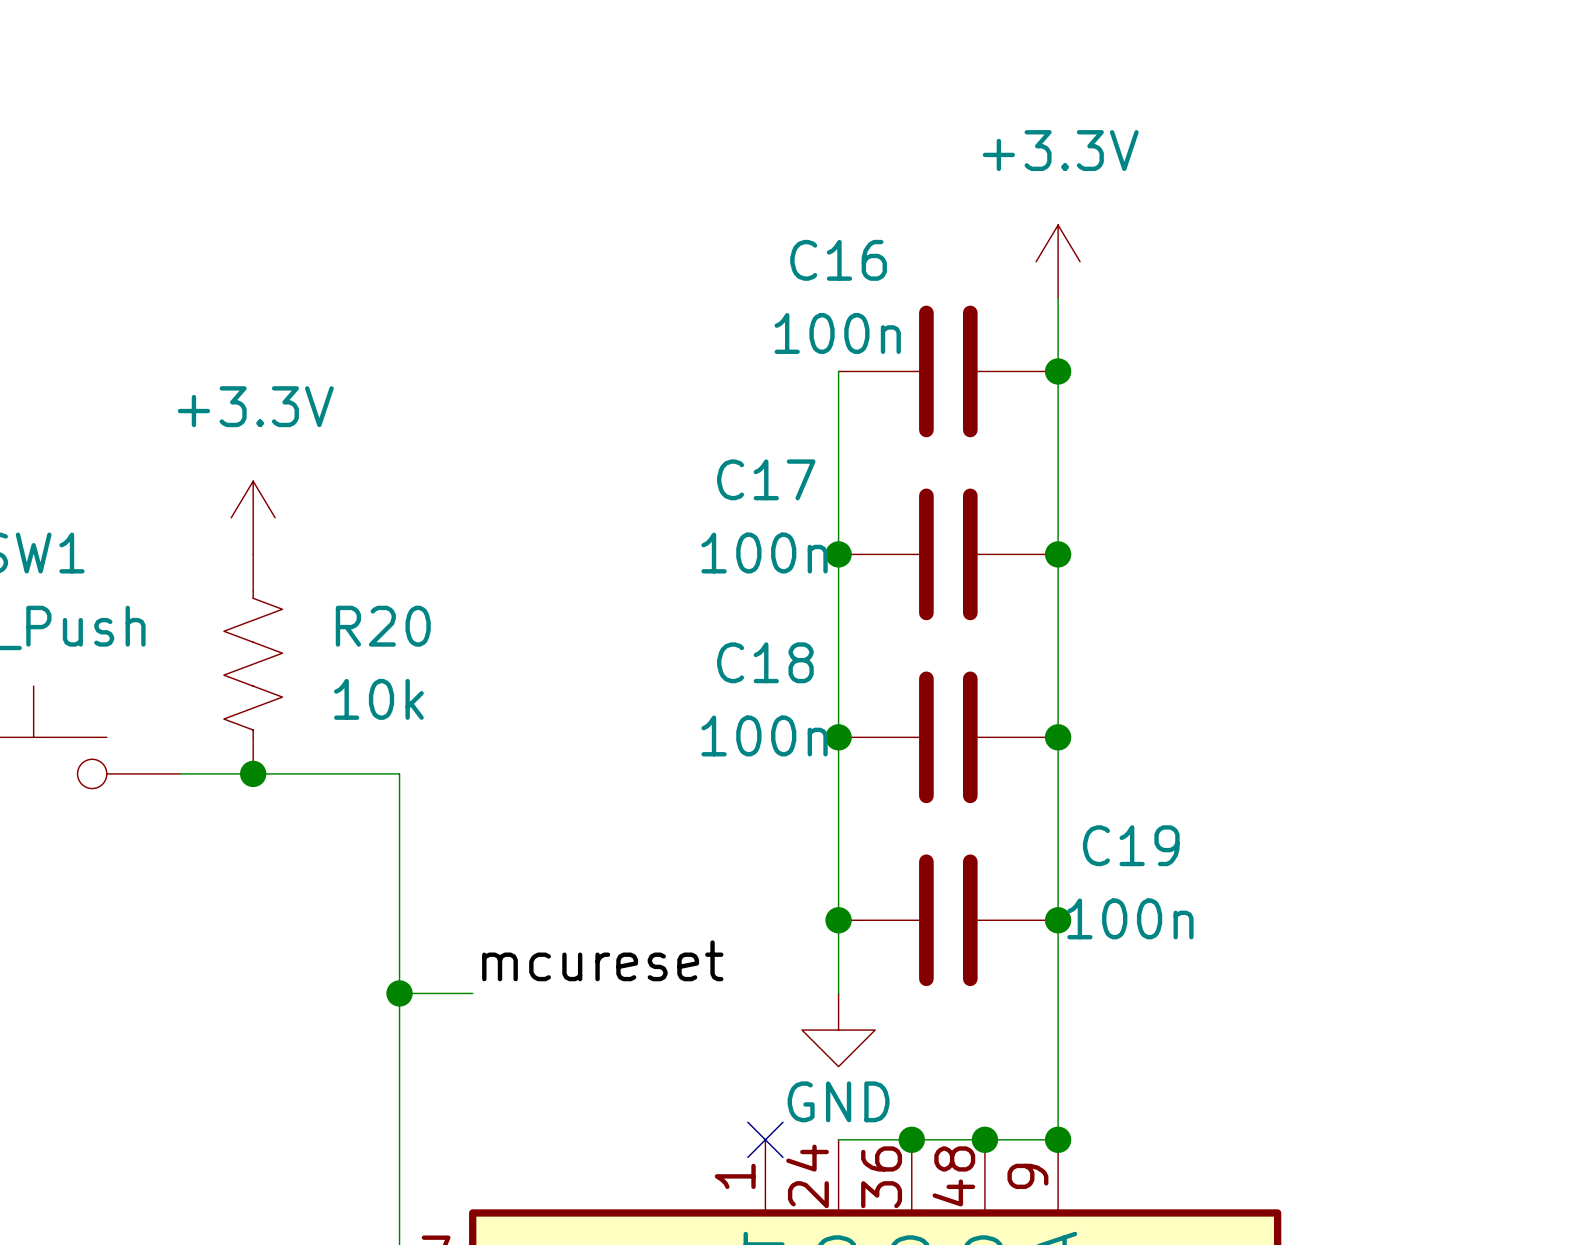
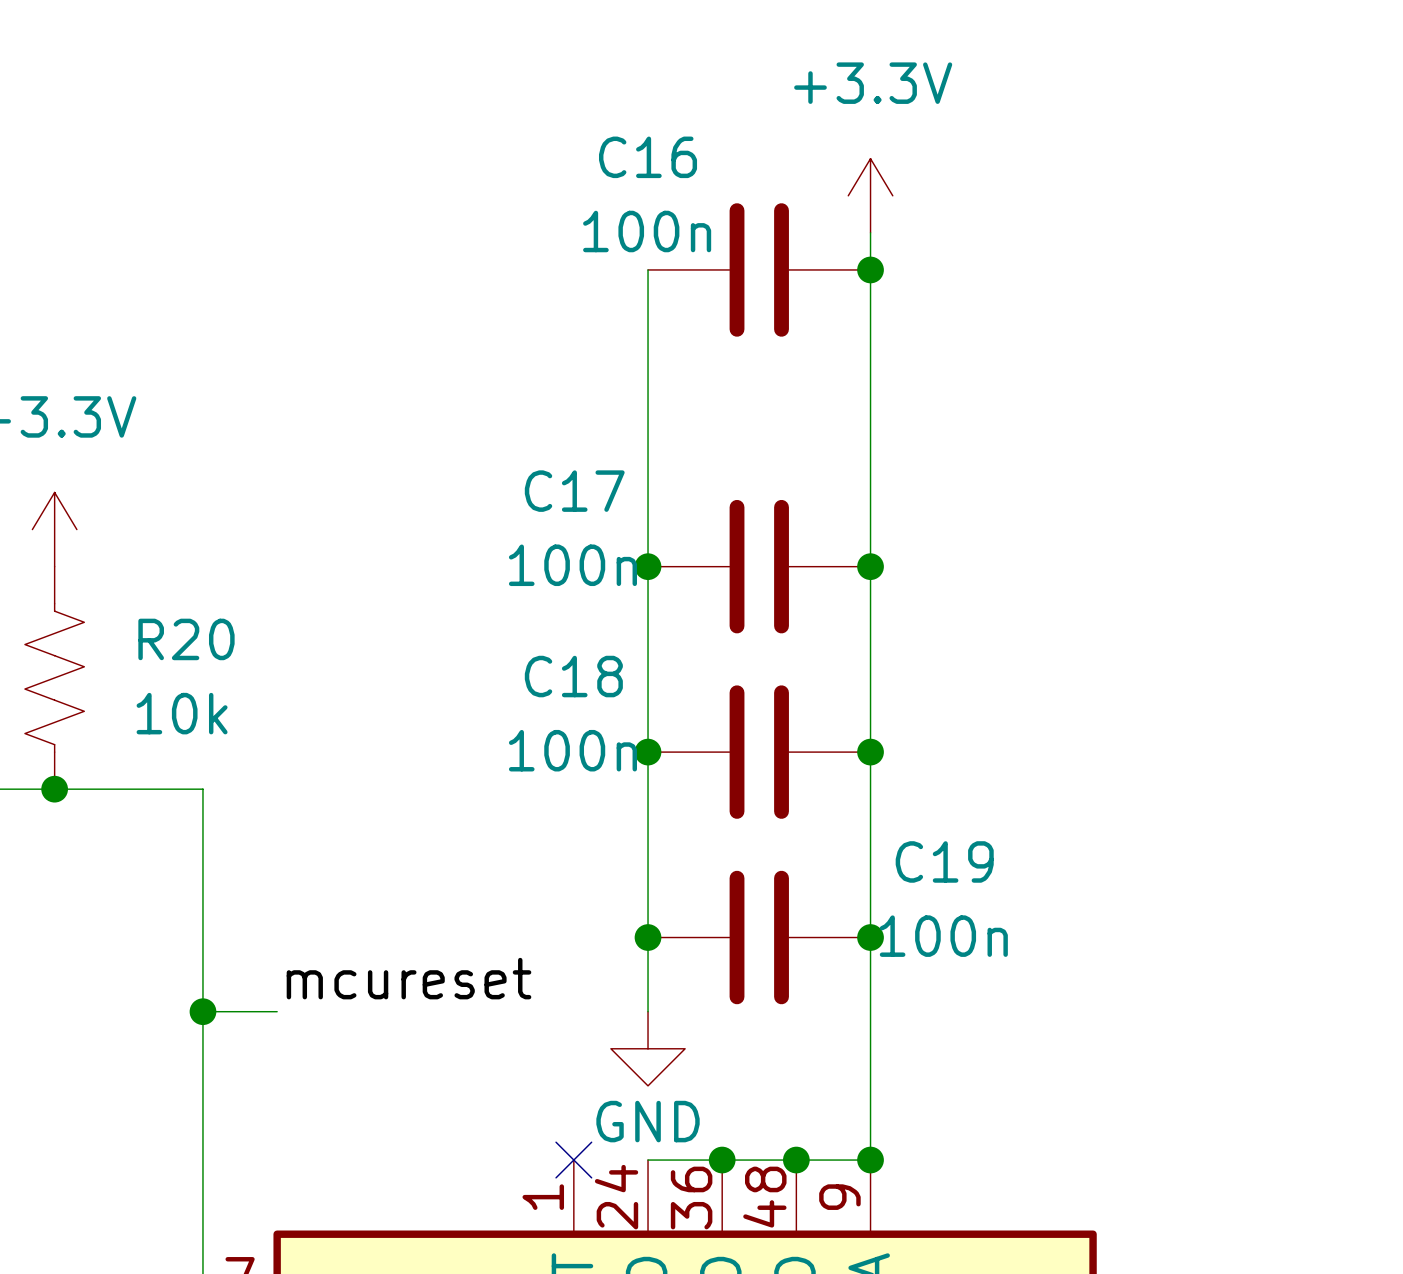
wire: none -> (648, 269) (648, 381)
power symbol position: +3.3V (1058, 261) -> +3.3V (870, 195)
C16 position: (948, 371) -> (759, 269)
junction position: (1058, 371) -> (870, 269)

